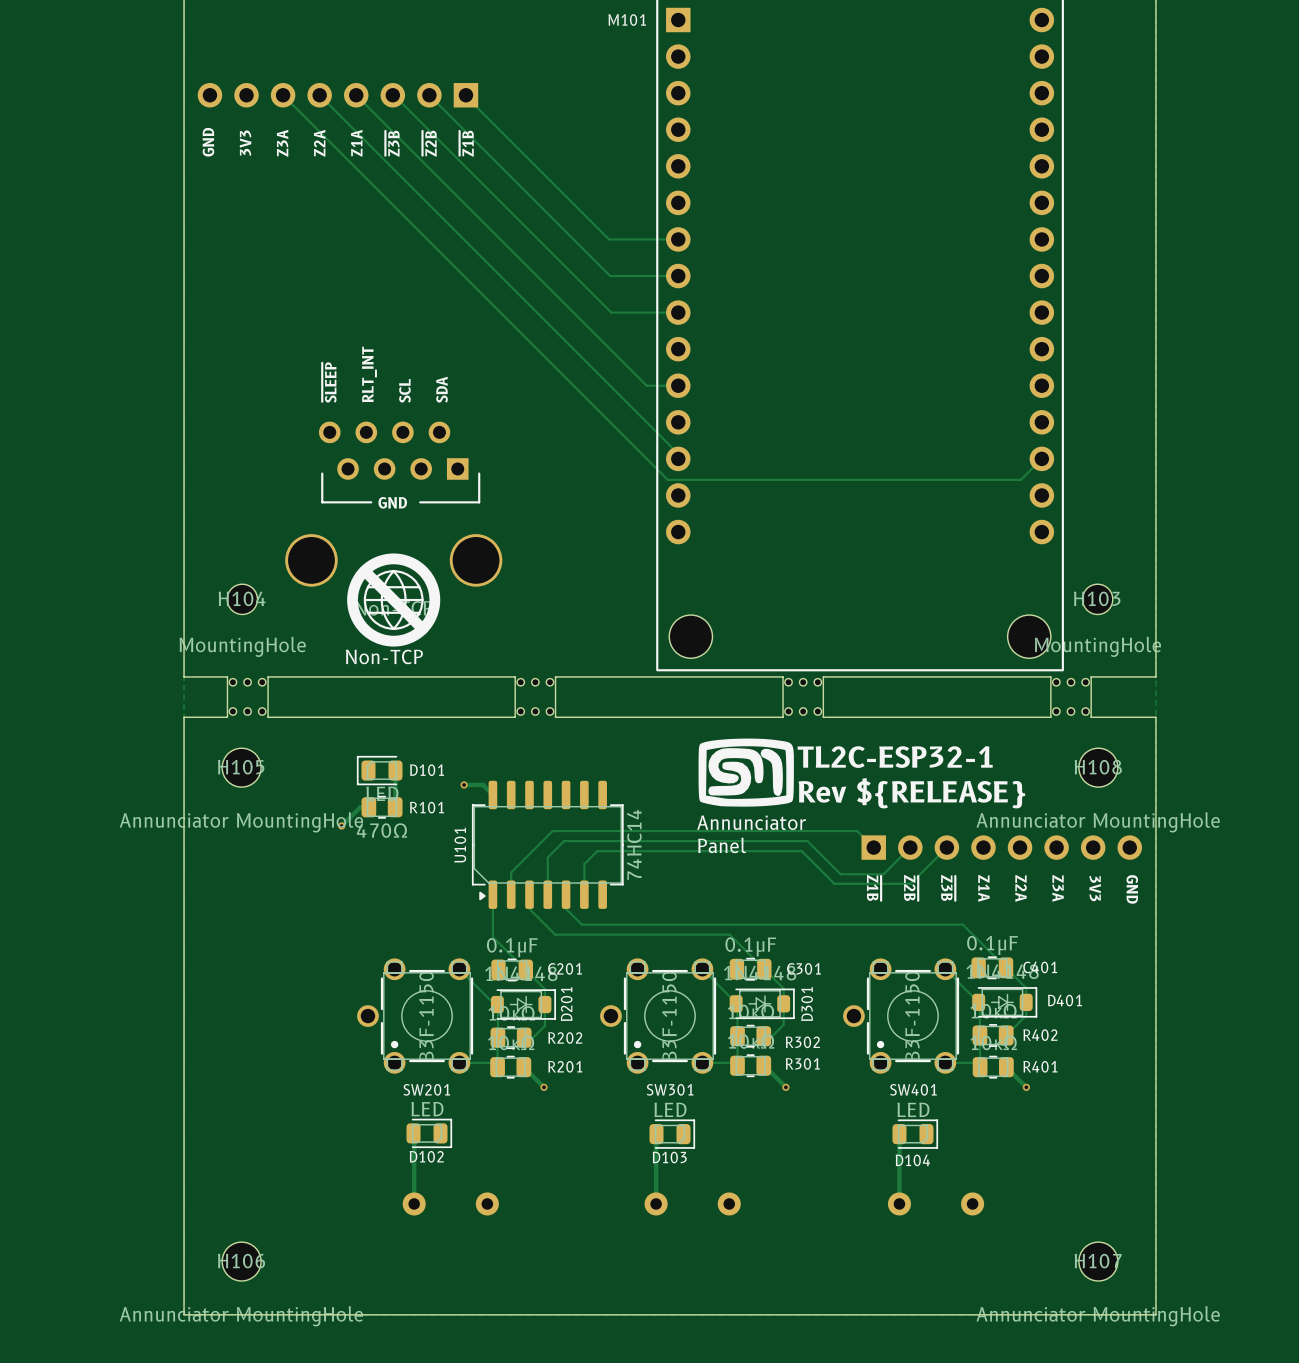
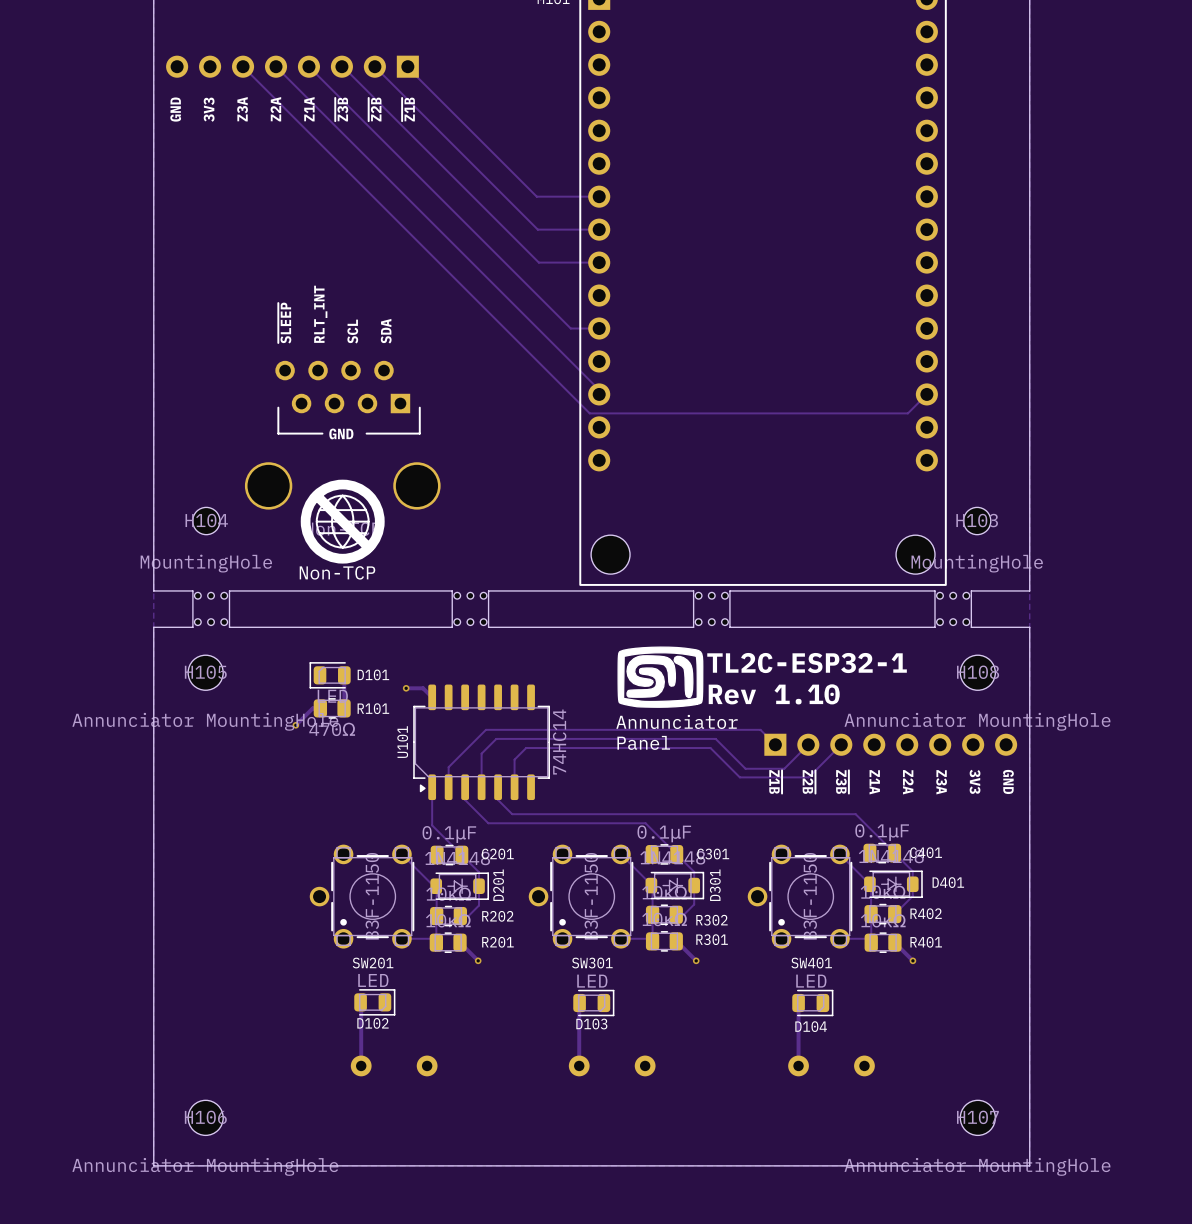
text: Rev ${RELEASE} (911, 793) -> Rev 1.10 (774, 694)

